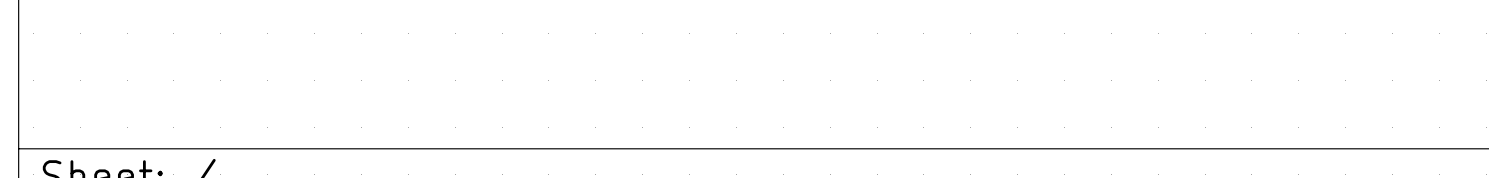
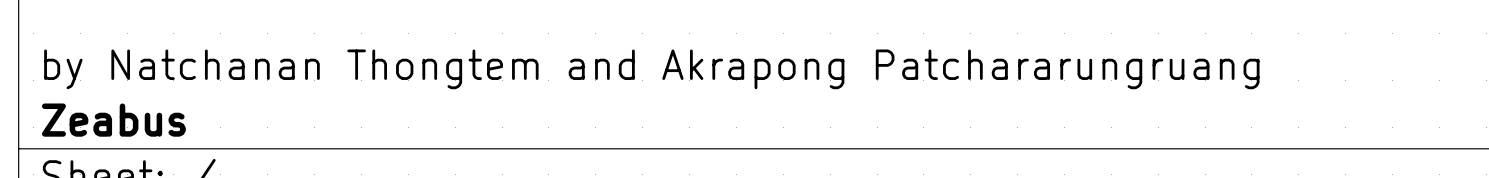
title block: none -> by Natchanan Thongtem and Akrapong Patchararungruang (651, 69)
title block: none -> Zeabus (113, 120)

